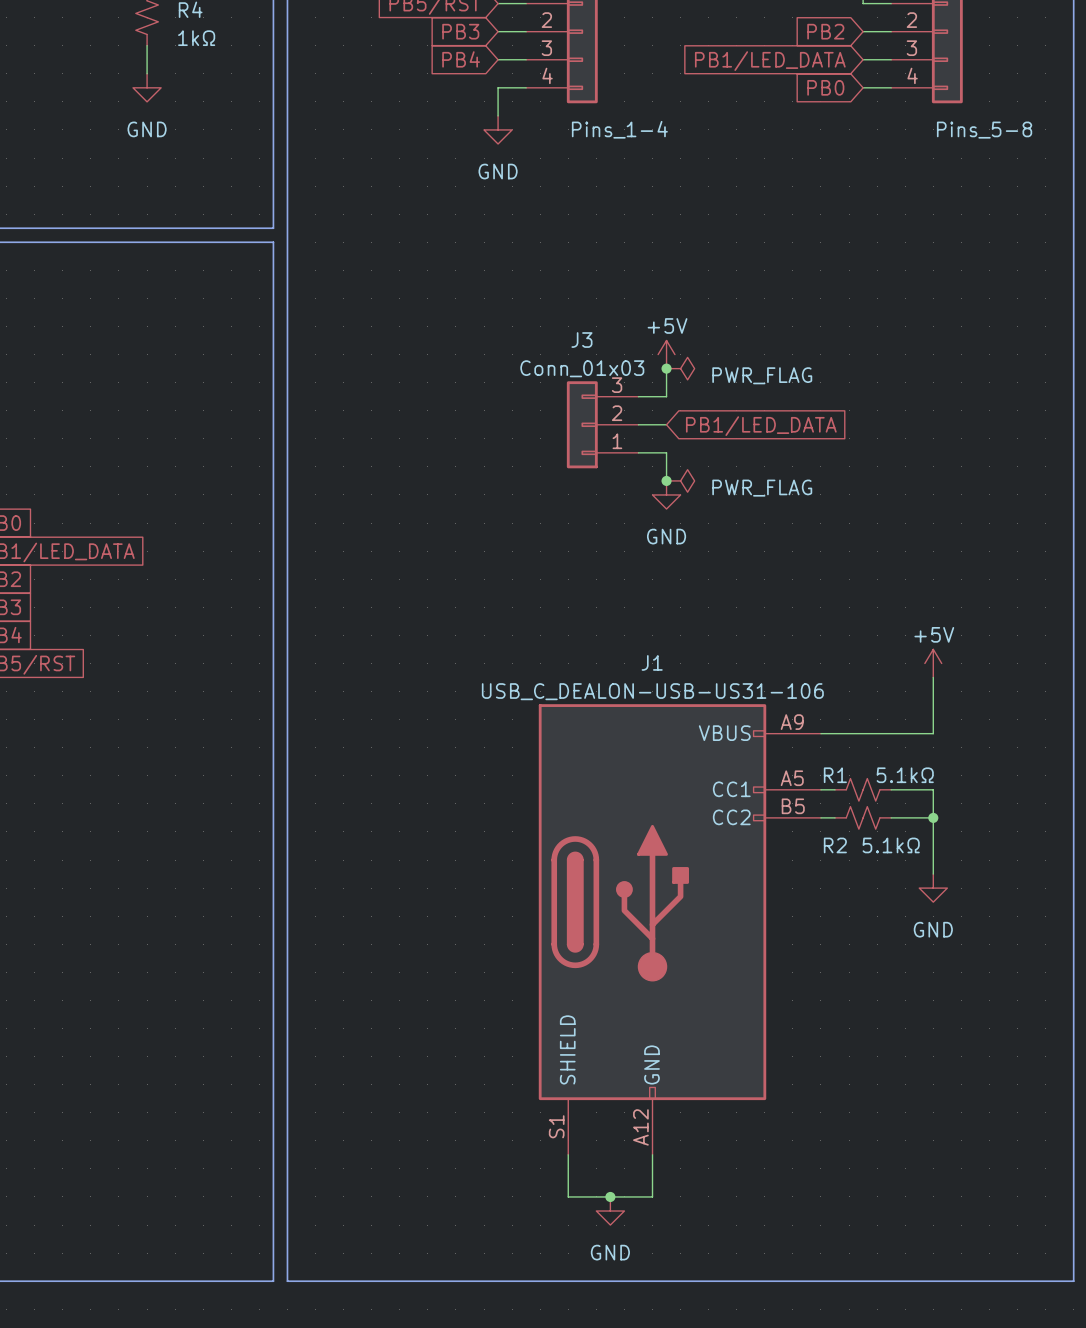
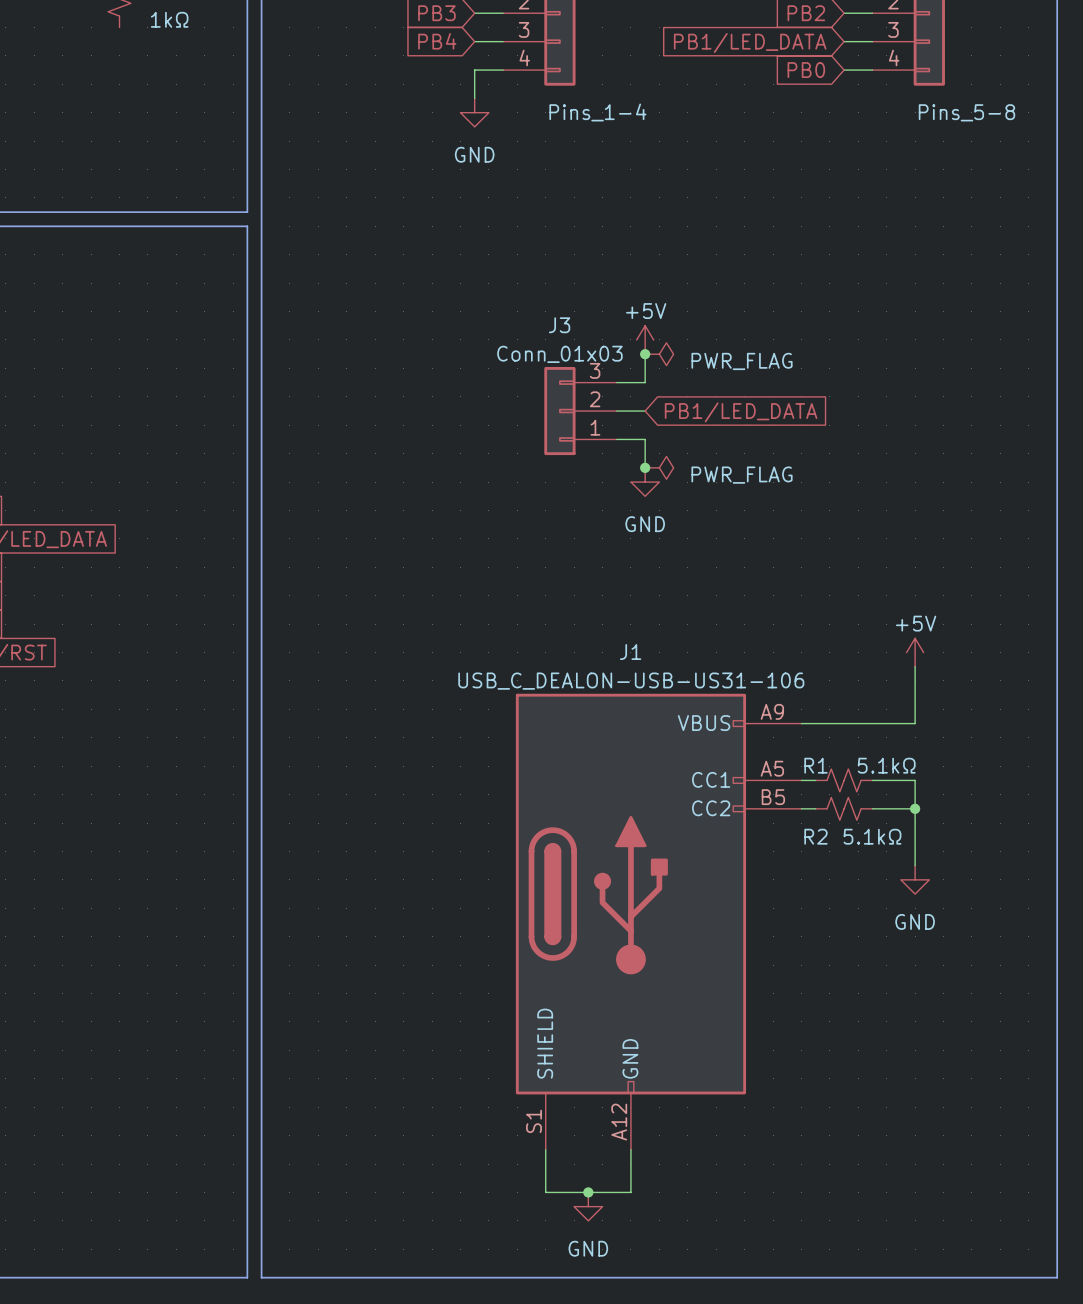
wire: (147, 45) (147, 73) -> none
power symbol: GND (147, 87) -> none

